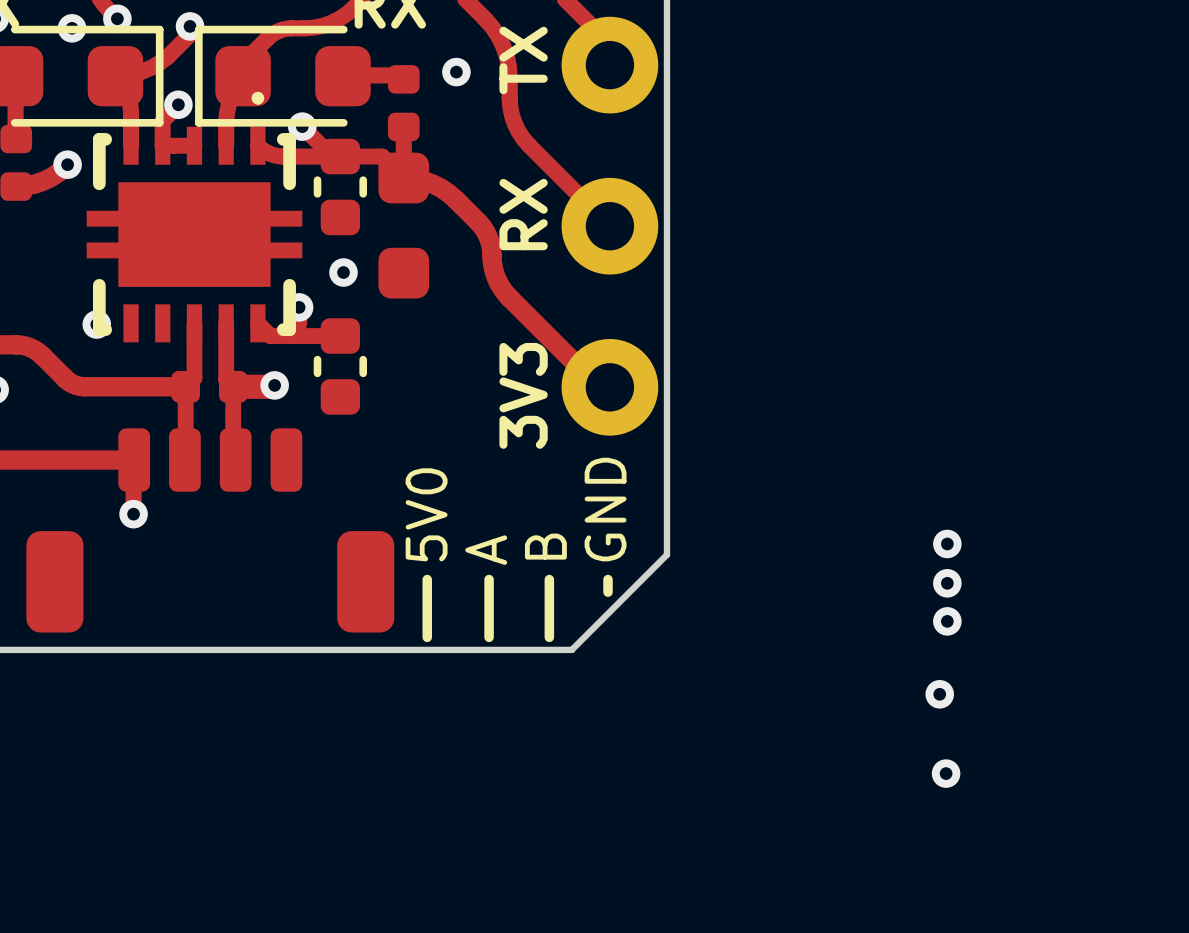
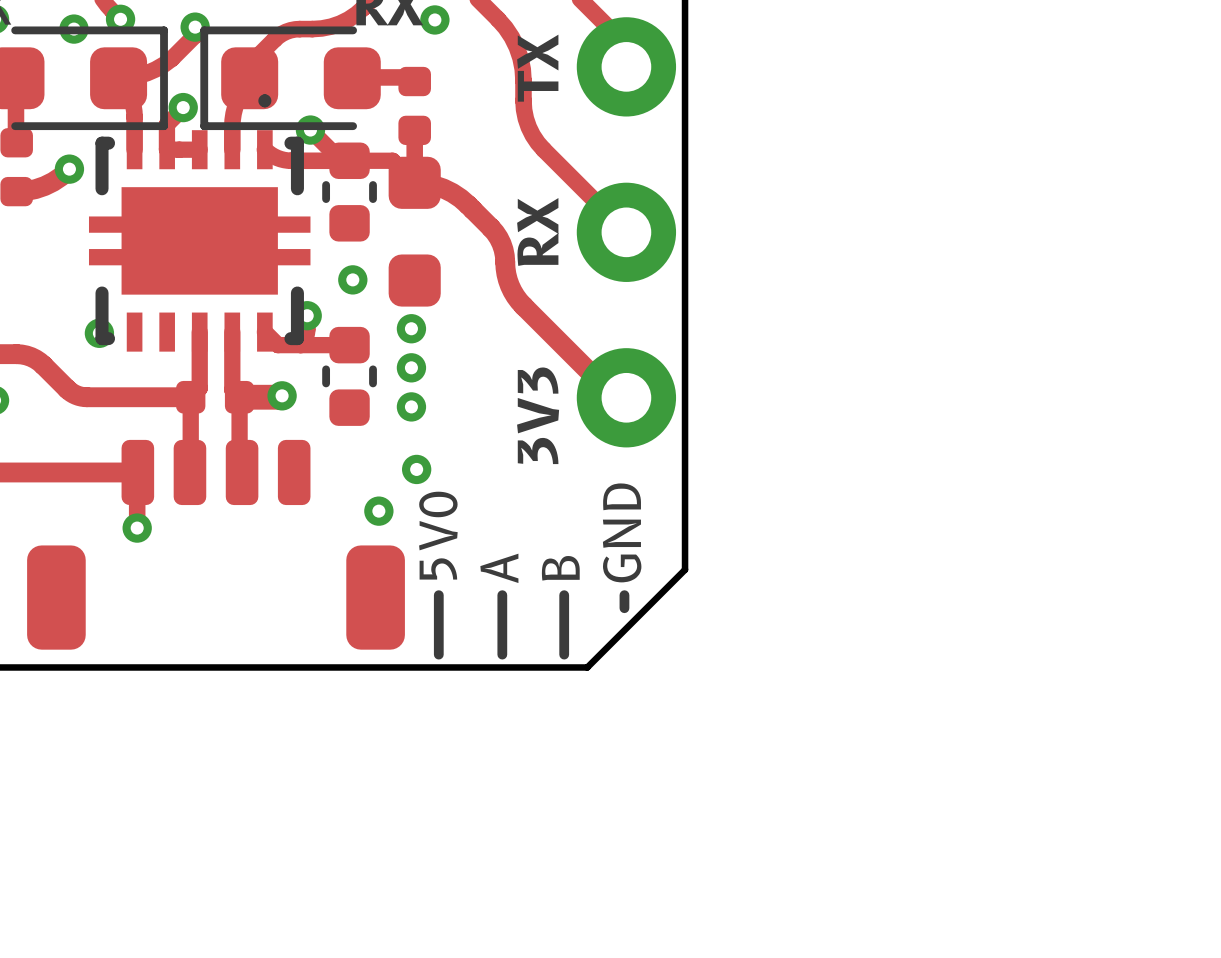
via: none -> (434, 19)
via: (456, 72) -> none
via: none -> (411, 328)
via: none -> (411, 367)
via: none -> (411, 406)
via: none -> (416, 469)
via: none -> (378, 511)
via: (947, 543) -> none
via: (947, 583) -> none
via: (947, 621) -> none
via: (939, 694) -> none
via: (946, 773) -> none

